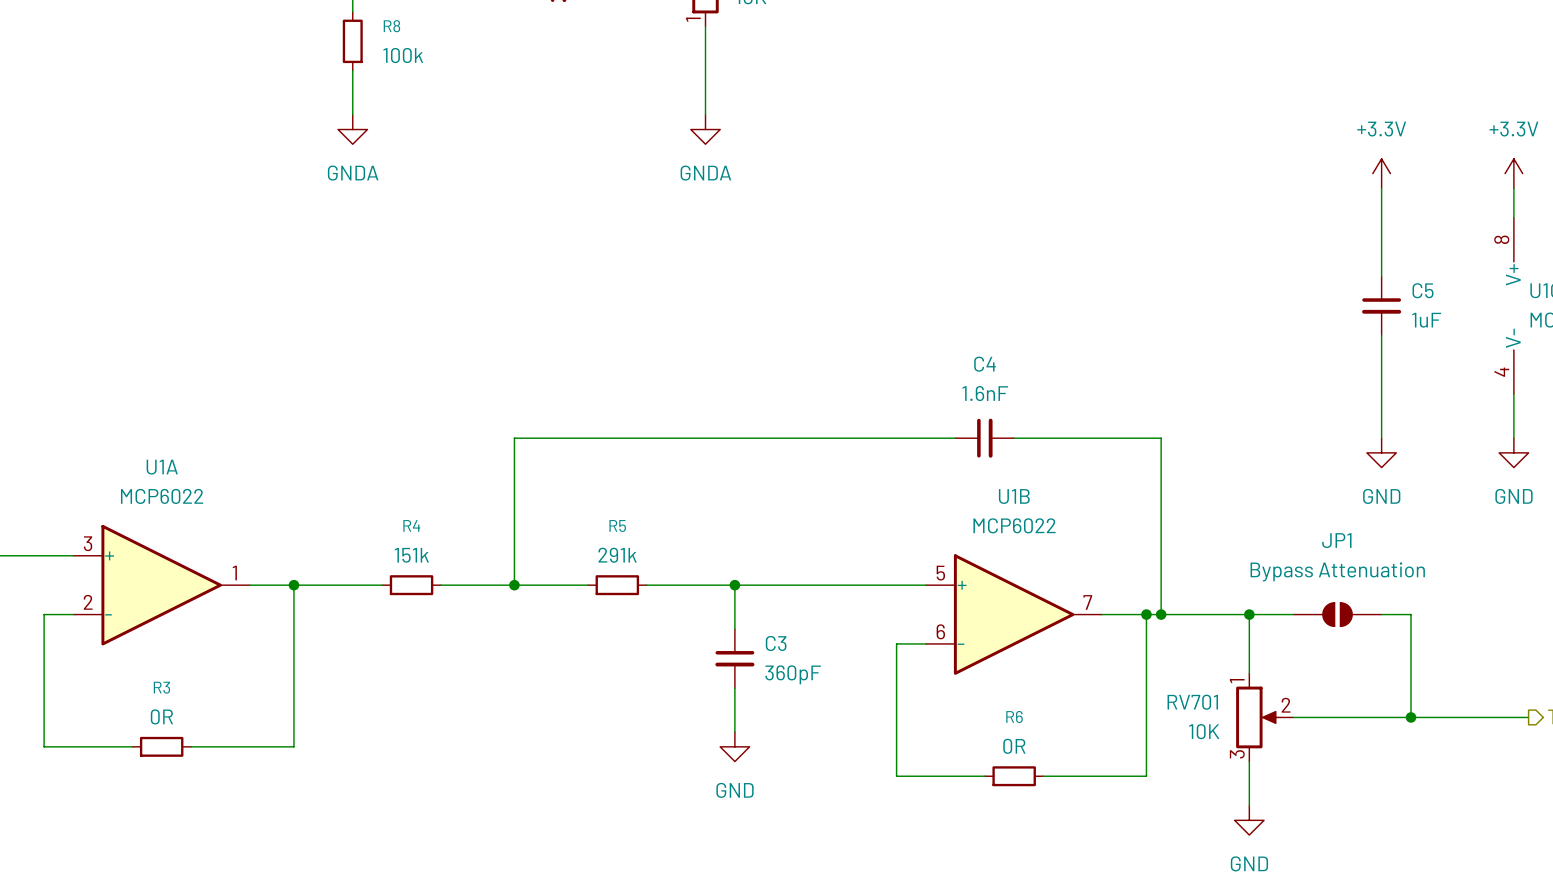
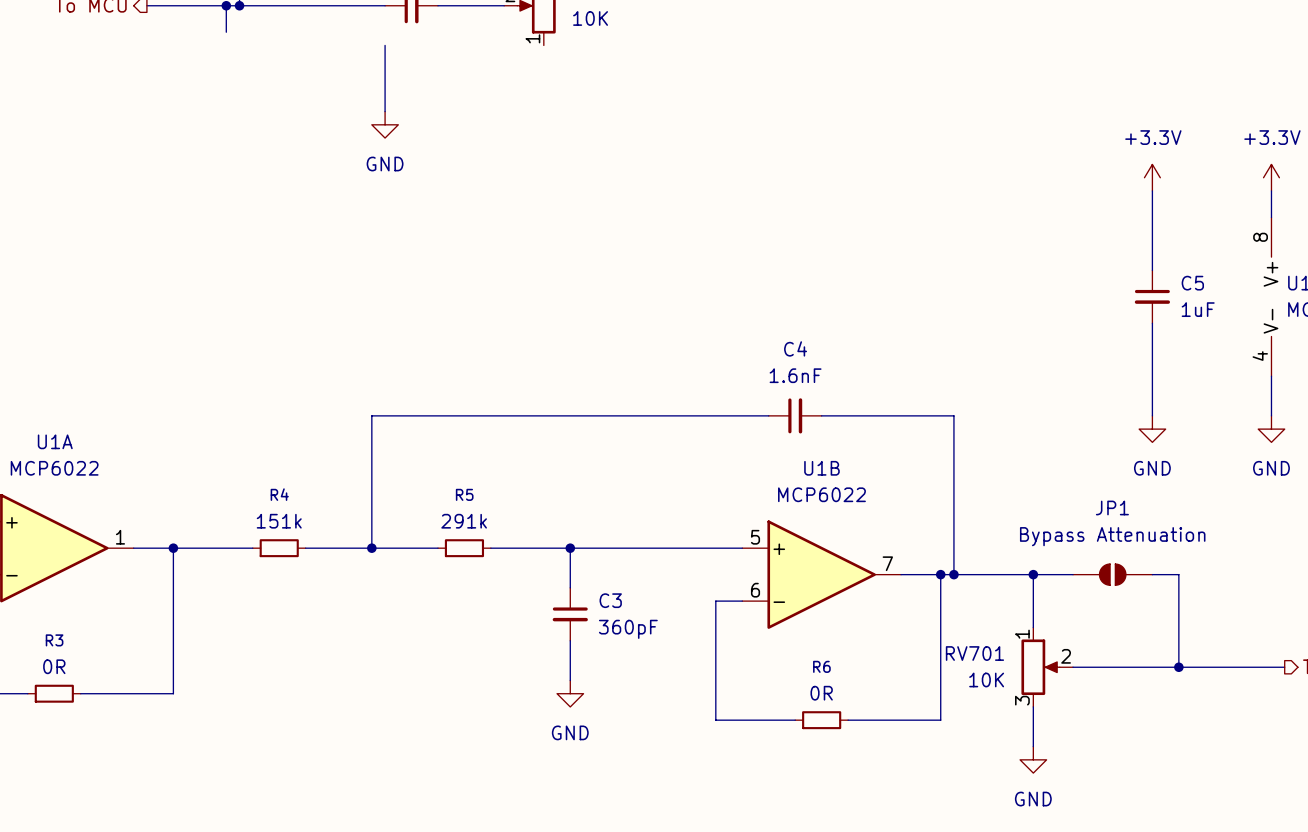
wire: none -> (385, 45) (385, 111)
wire: (705, 26) (705, 114) -> none
R8: 100k (352, 41) -> none
wire: (352, 70) (352, 114) -> none
power symbol: none -> GND (385, 124)
power symbol: GNDA (352, 129) -> none
power symbol: GNDA (705, 129) -> none

